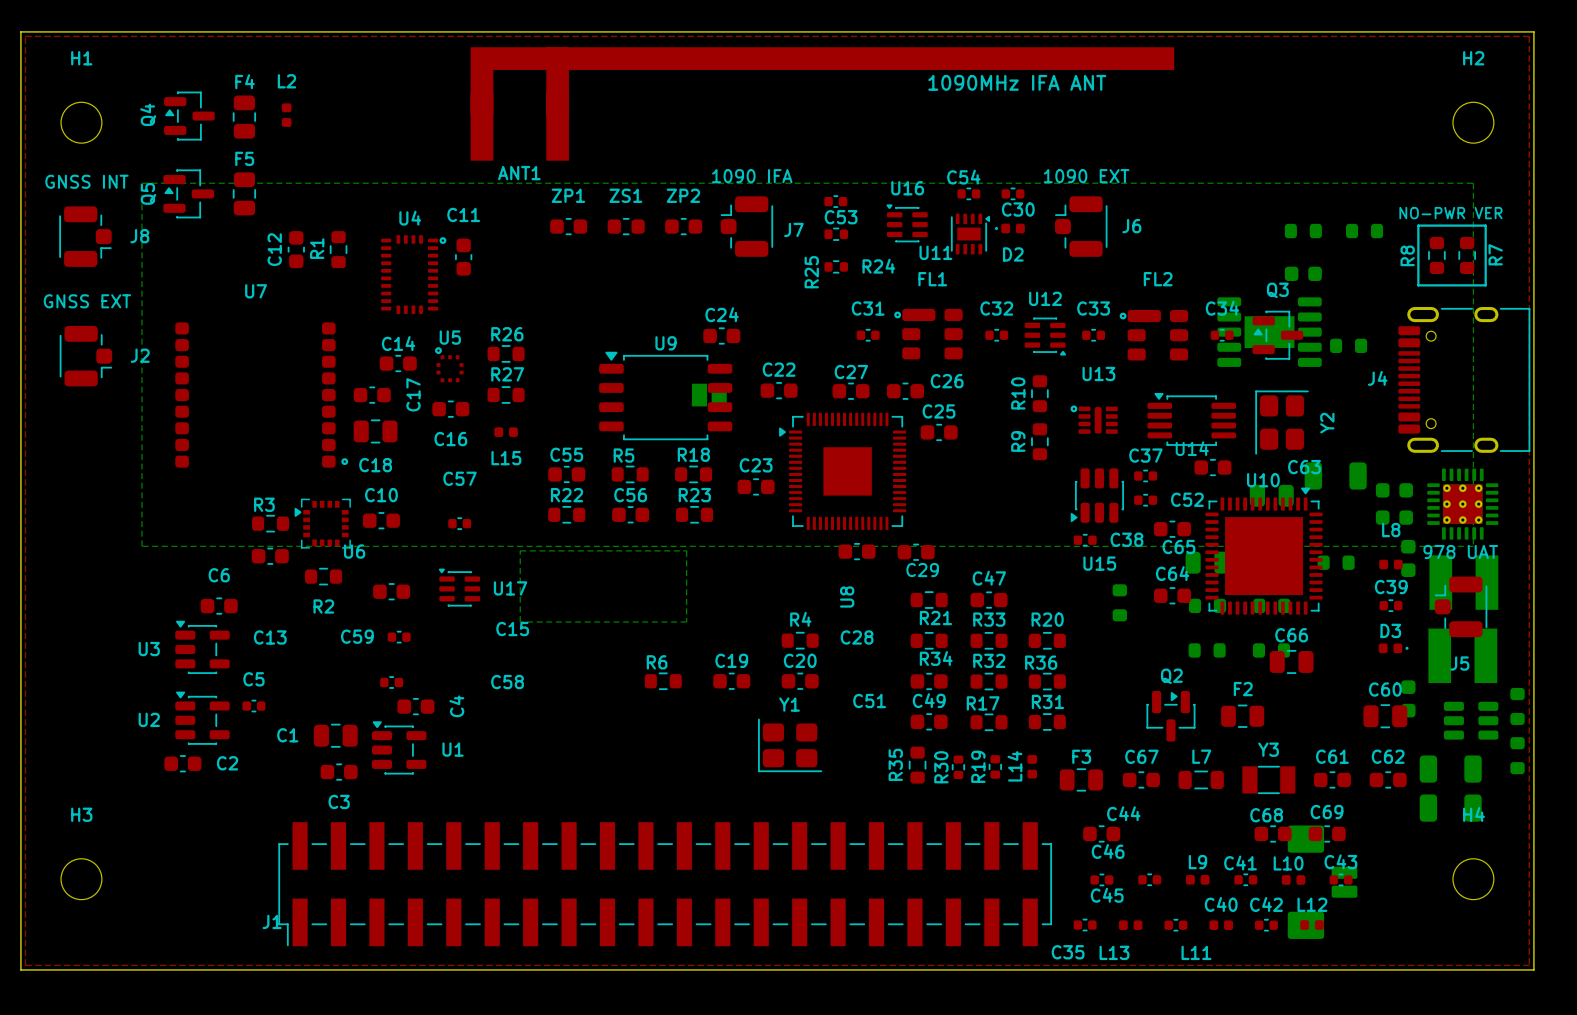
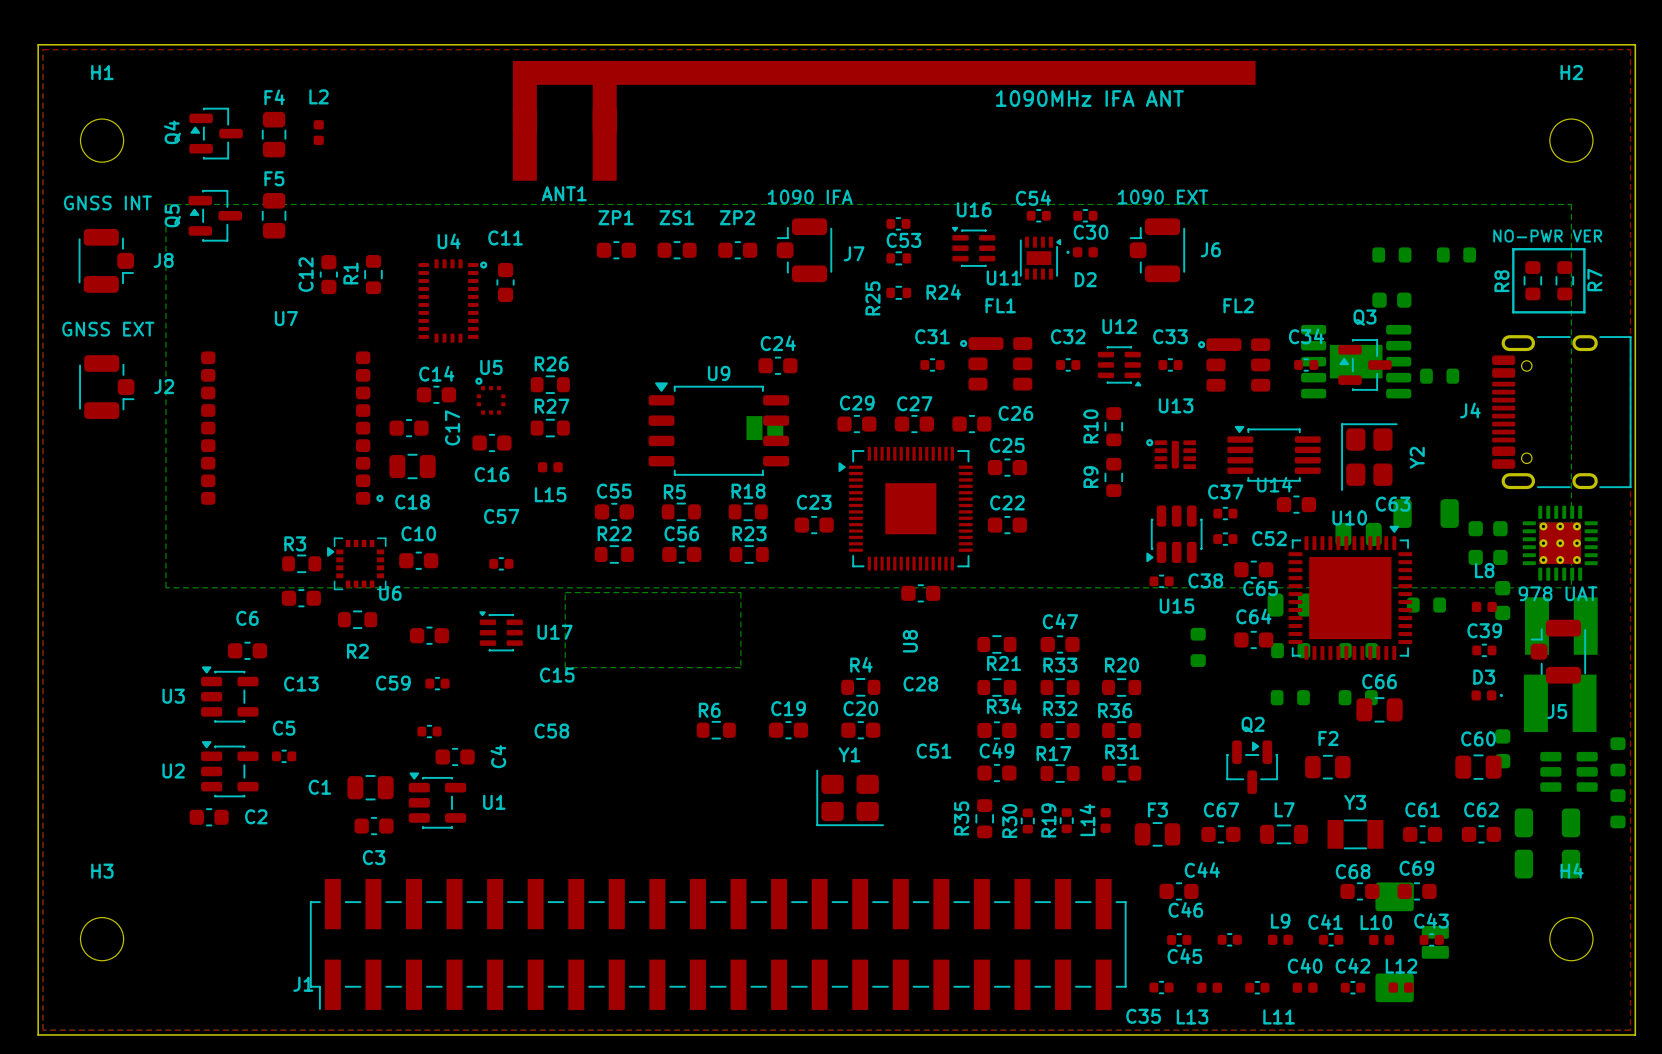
C22 position: (779, 390) -> (1007, 525)
C29 position: (916, 552) -> (856, 424)
C29 name position: C29 (922, 570) -> C29 (857, 403)

